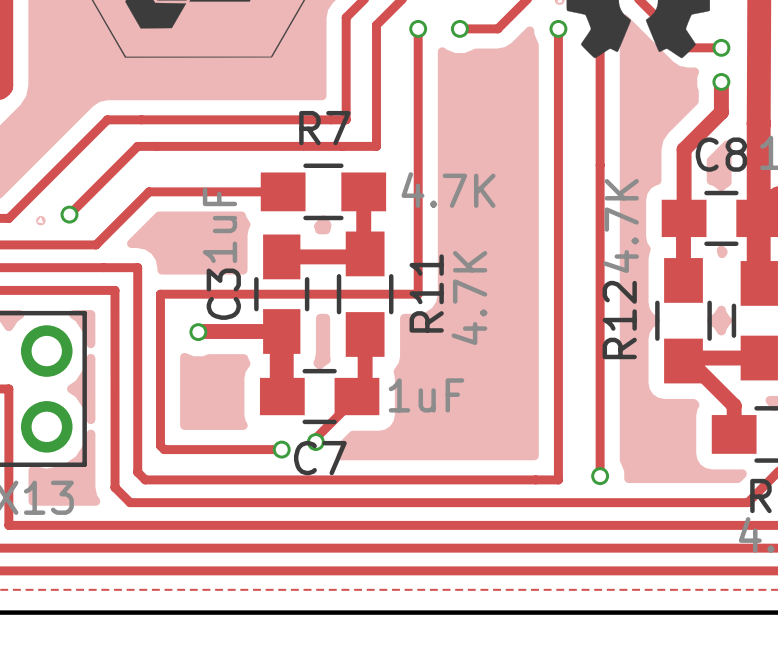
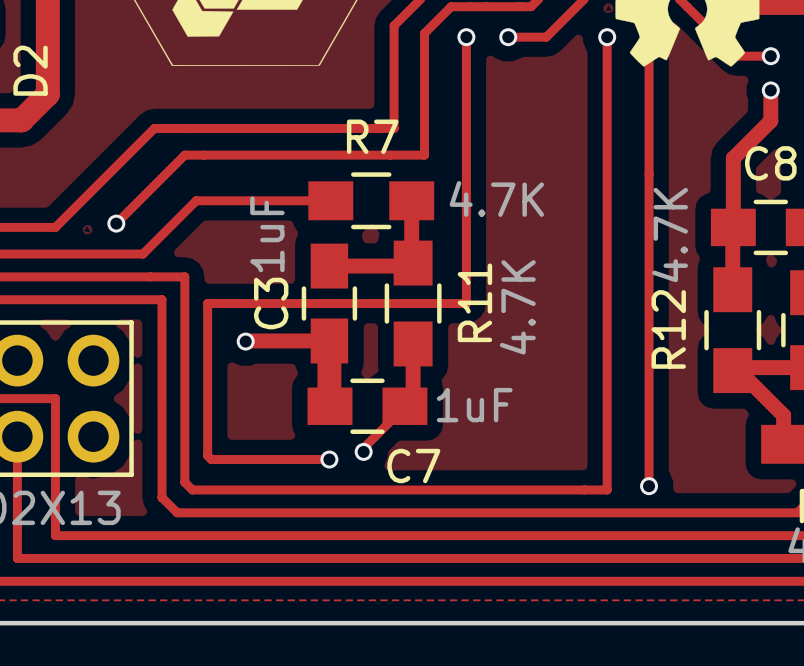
C7 name position: C7 (320, 458) -> C7 (413, 466)

